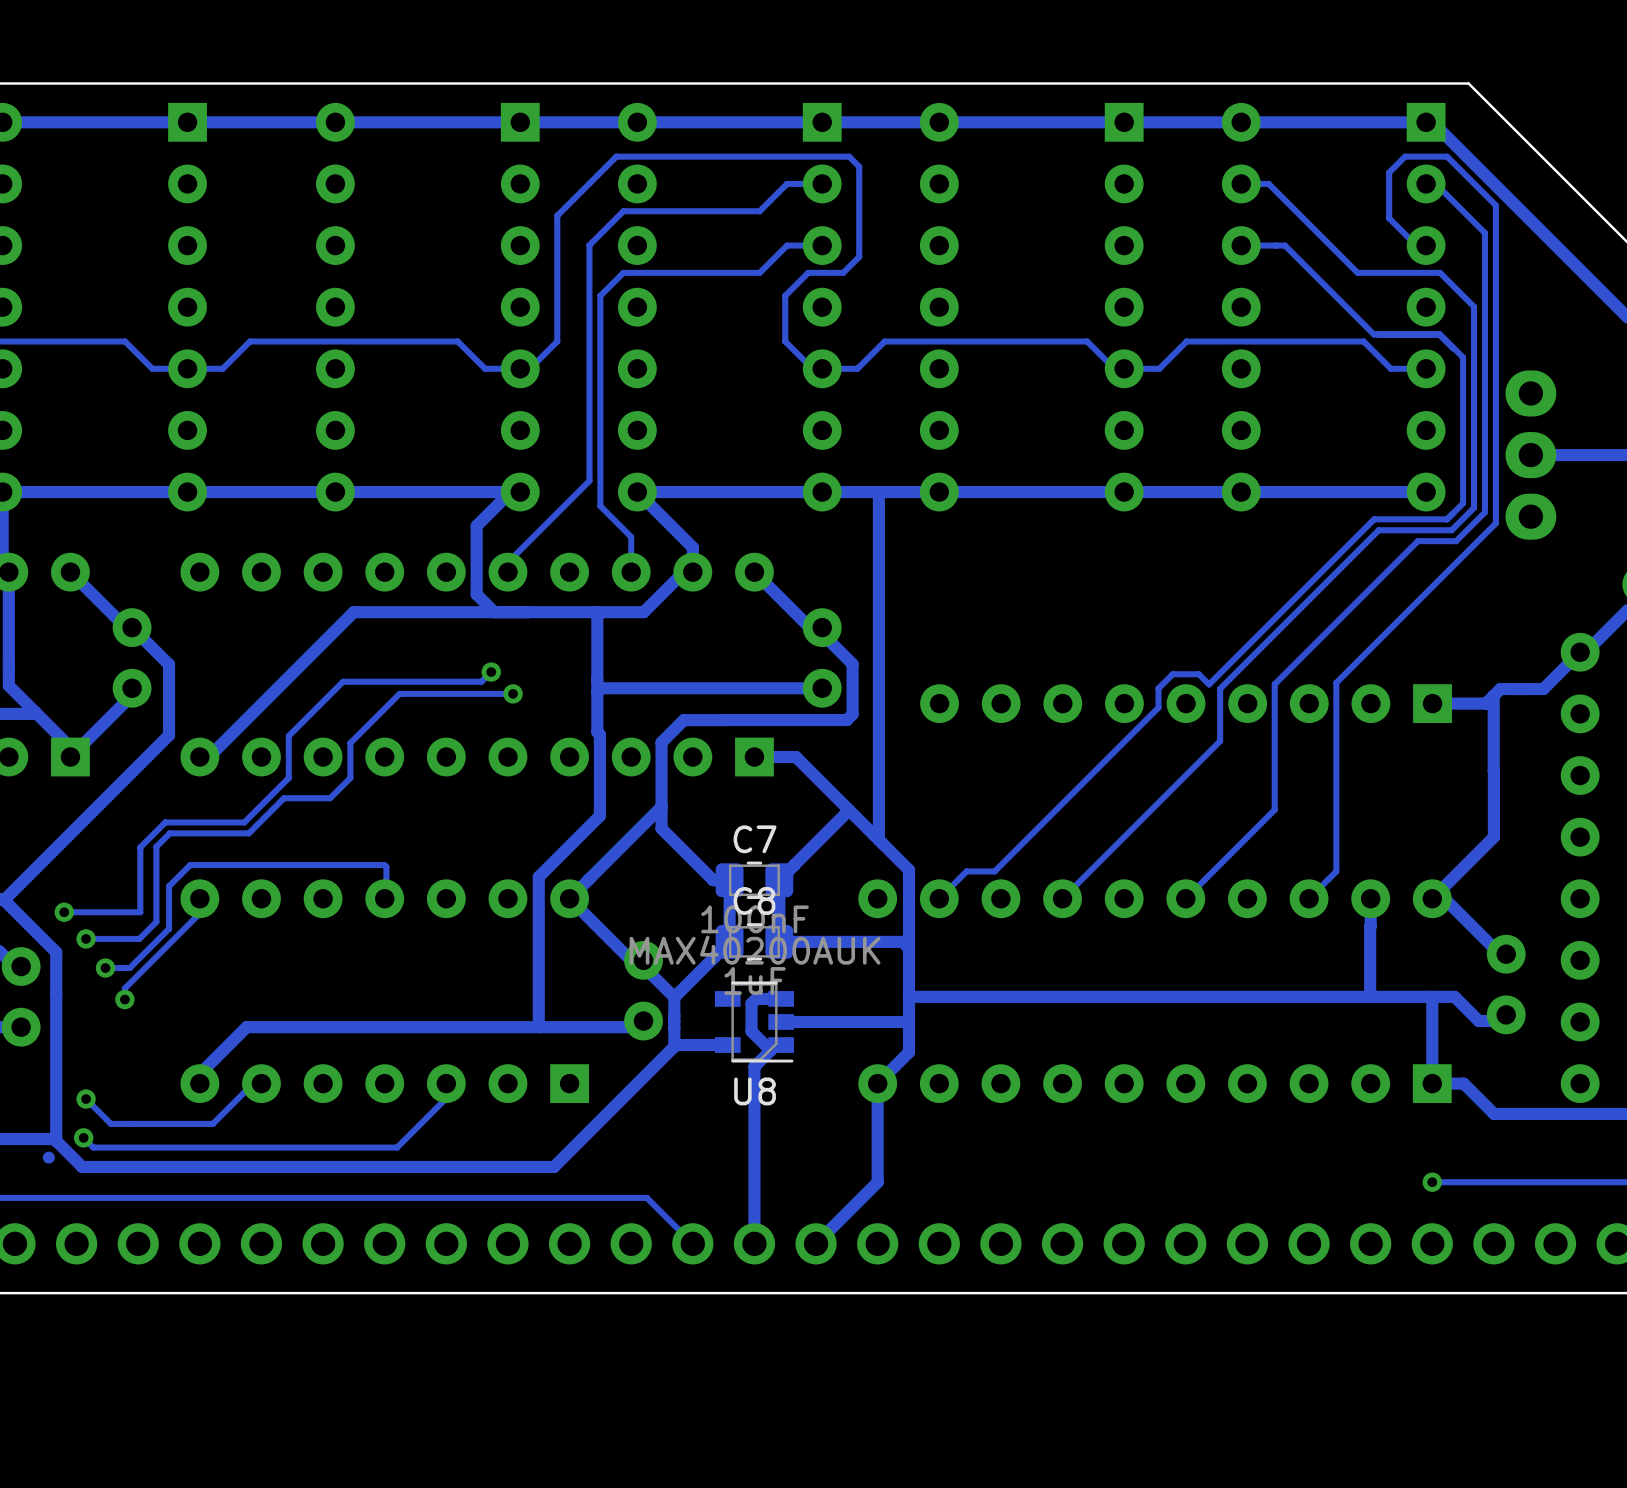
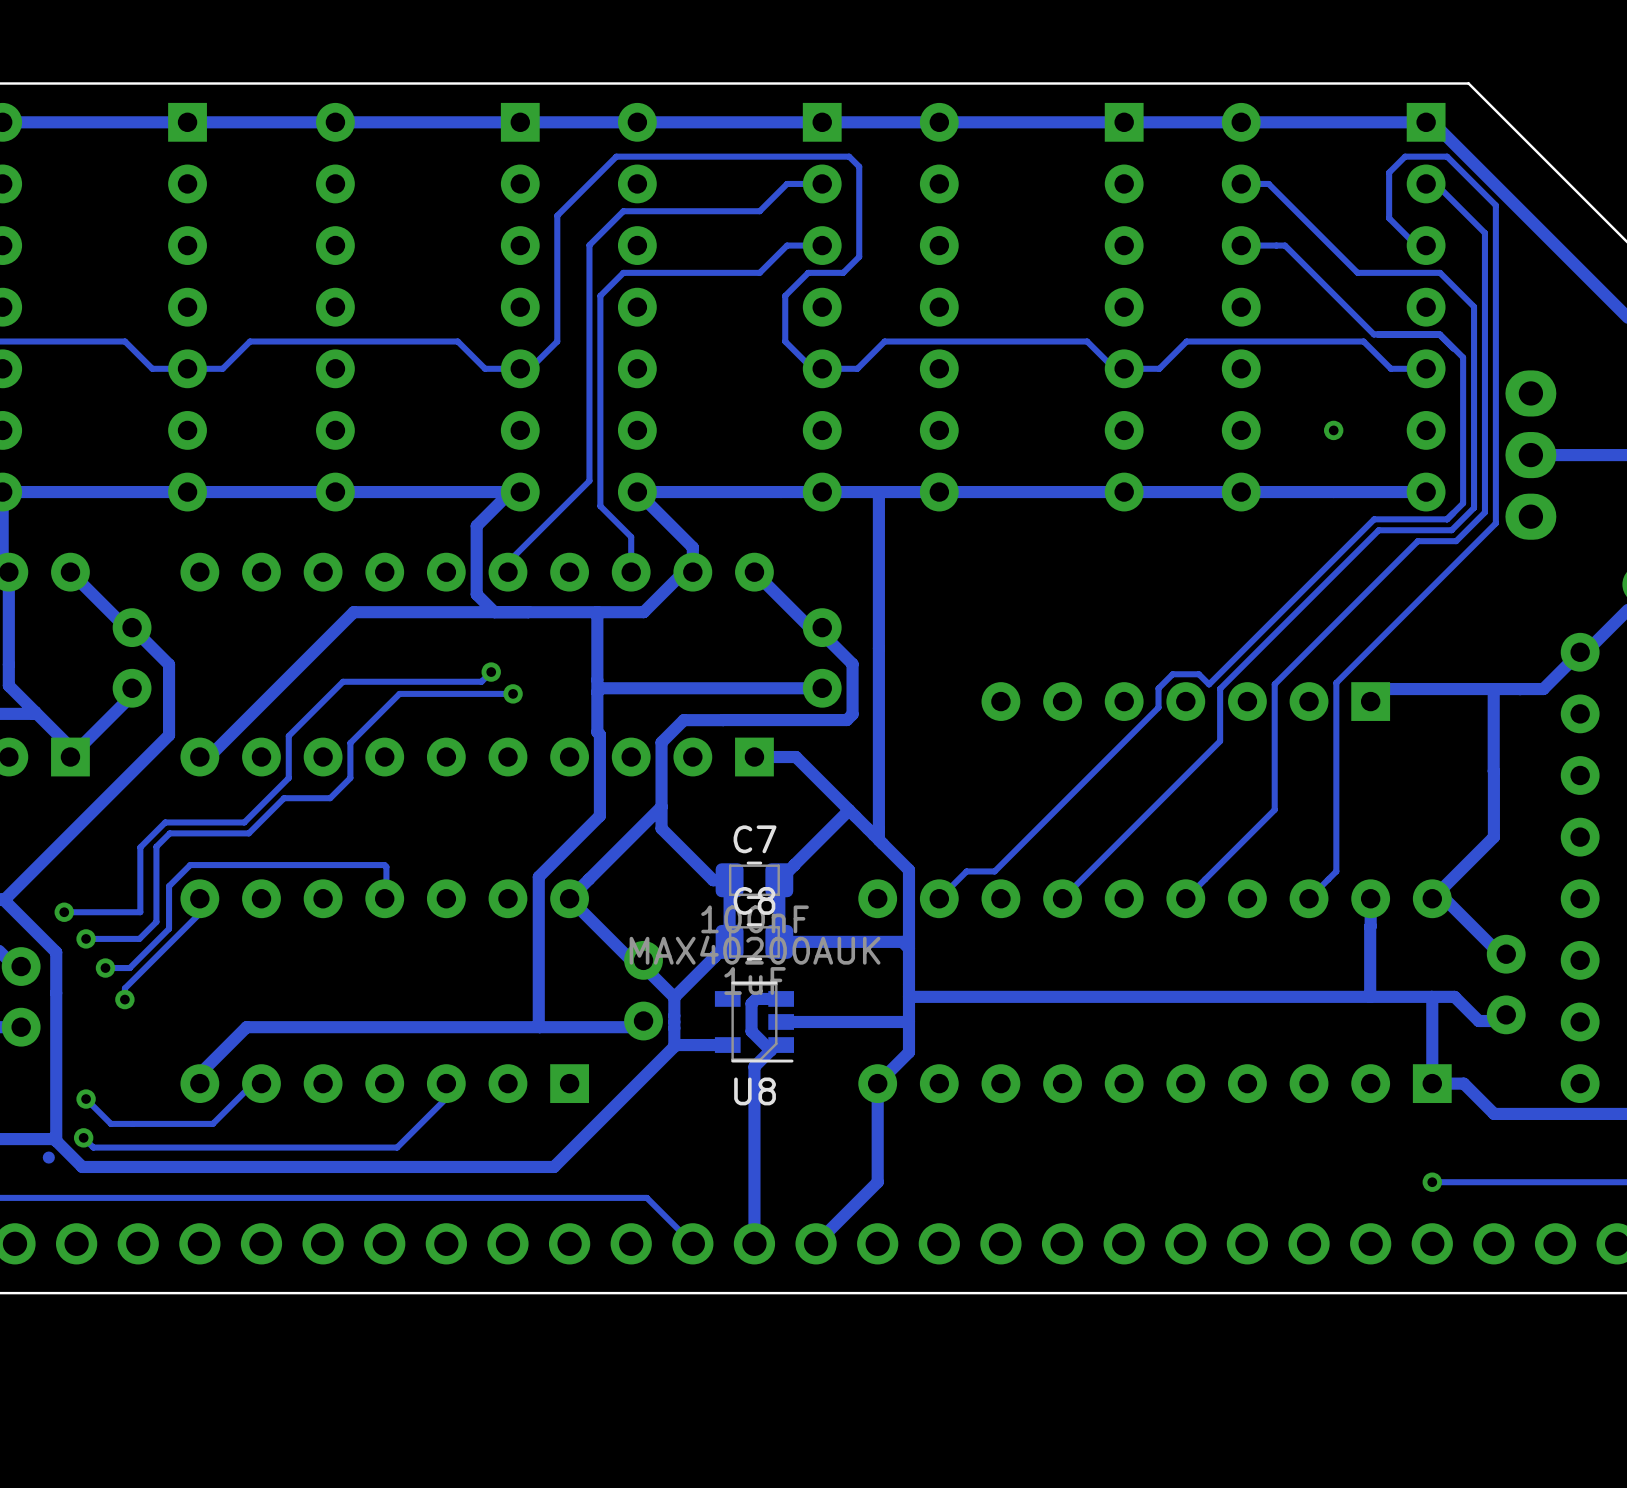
via: none -> (1333, 430)
part footprint: [920, 684, 1452, 724] -> [981, 682, 1391, 721]
track: (1500, 689) (1485, 703) (1432, 703) -> (1500, 689) (1371, 689)

